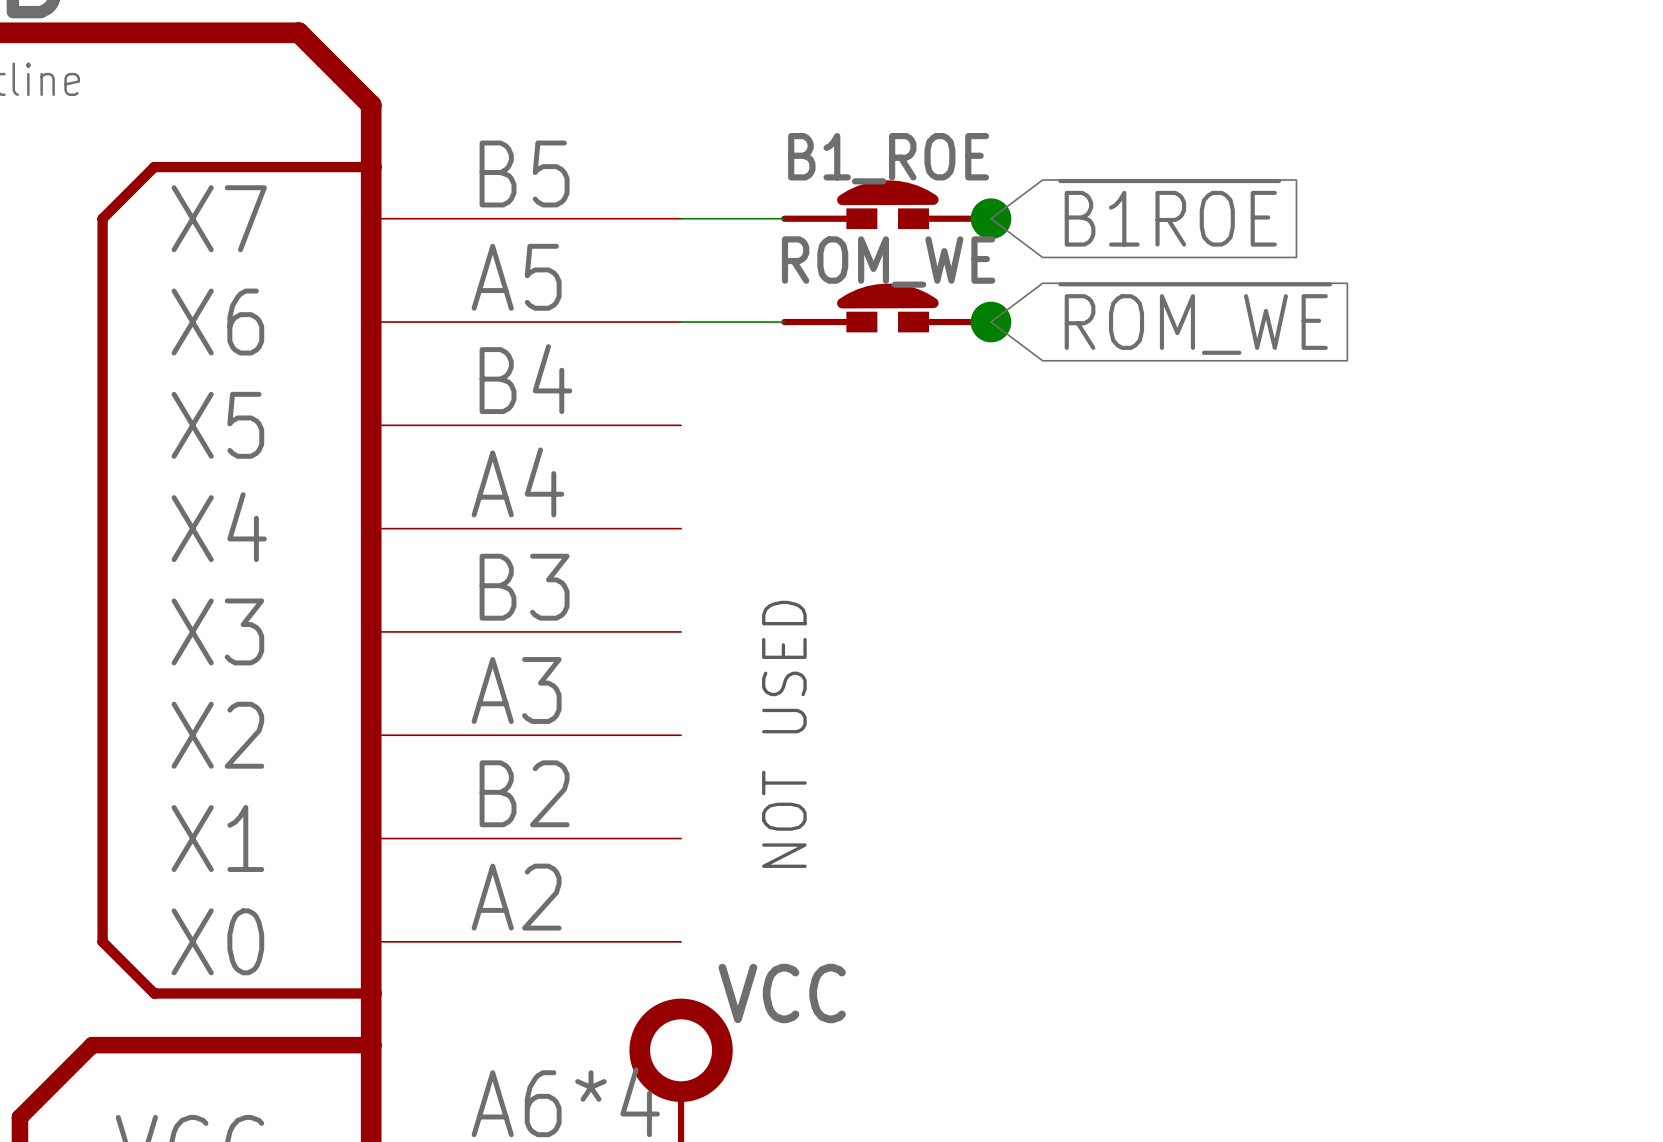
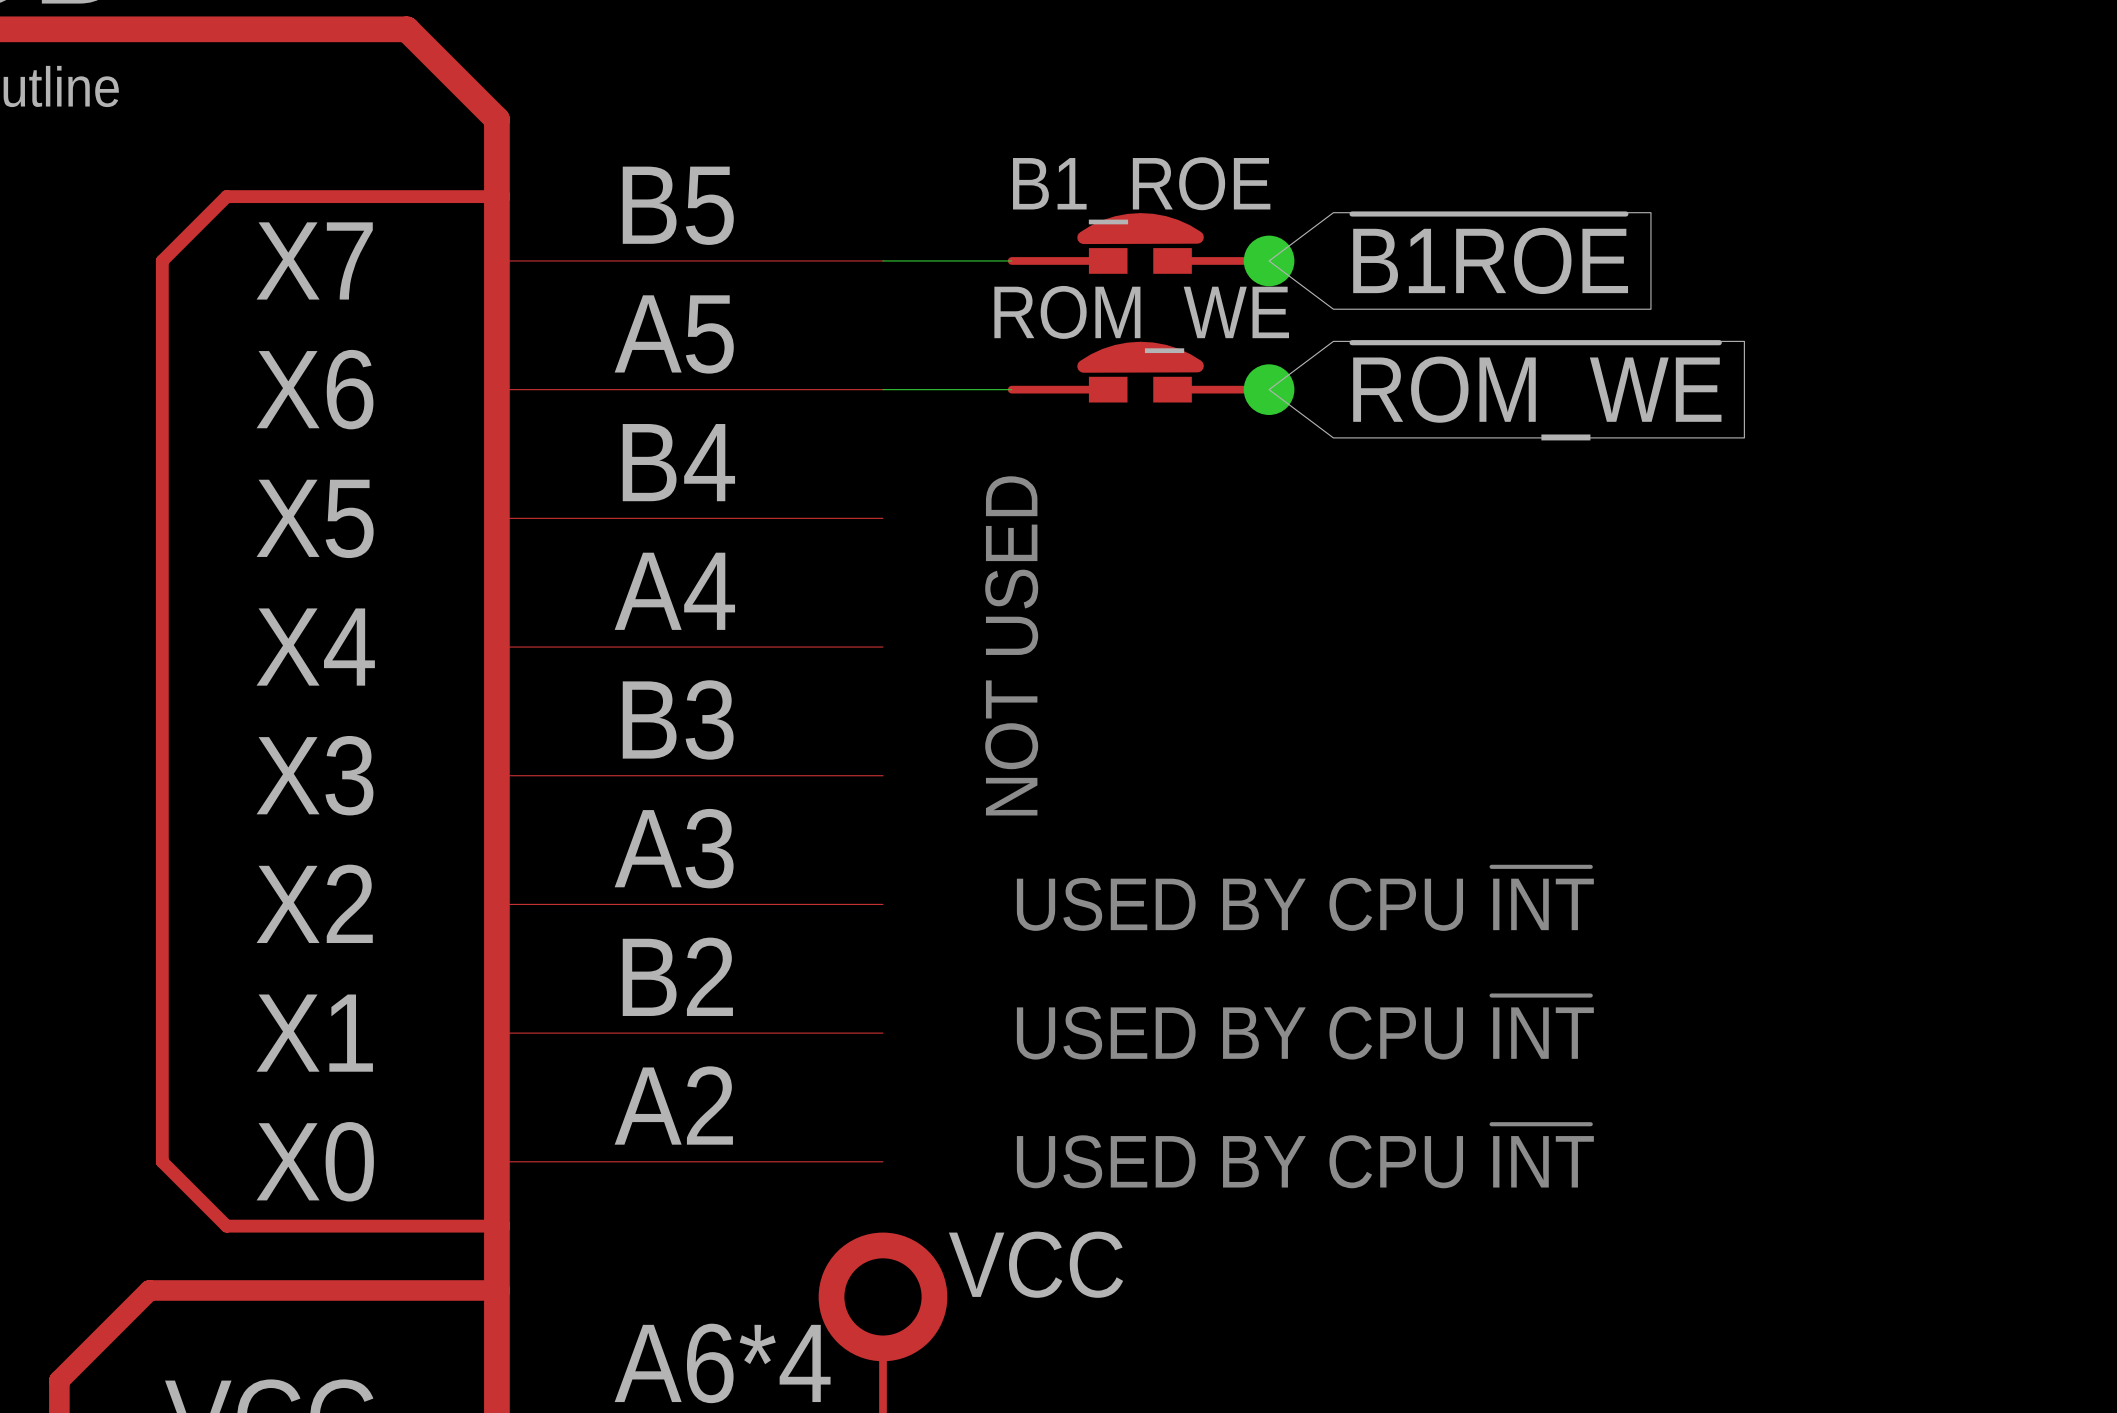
text: none -> NOT USED (1011, 645)
text: NOT USED (784, 734) -> USED BY CPU ~{INT} (1305, 898)
text: none -> USED BY CPU ~{INT} (1305, 1027)
text: none -> USED BY CPU ~{INT} (1305, 1156)
power symbol text position: VCC (782, 993) -> VCC (1036, 1264)

